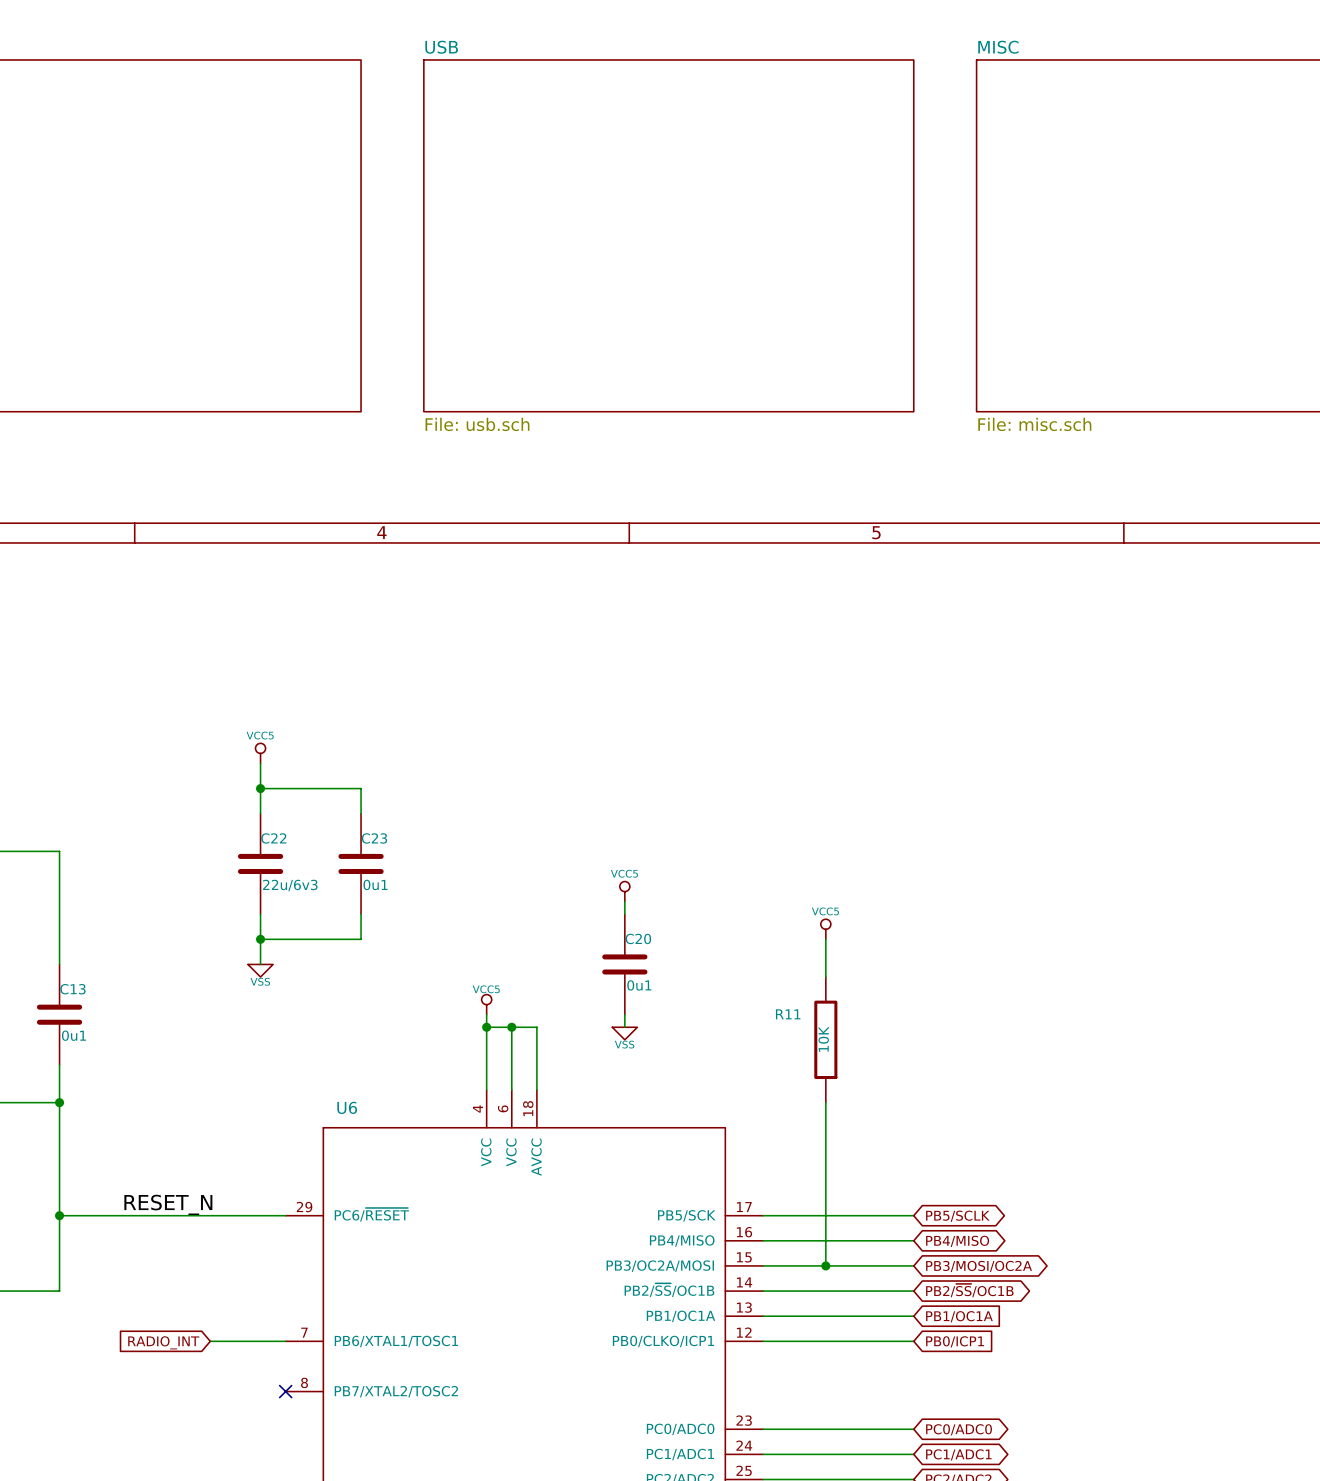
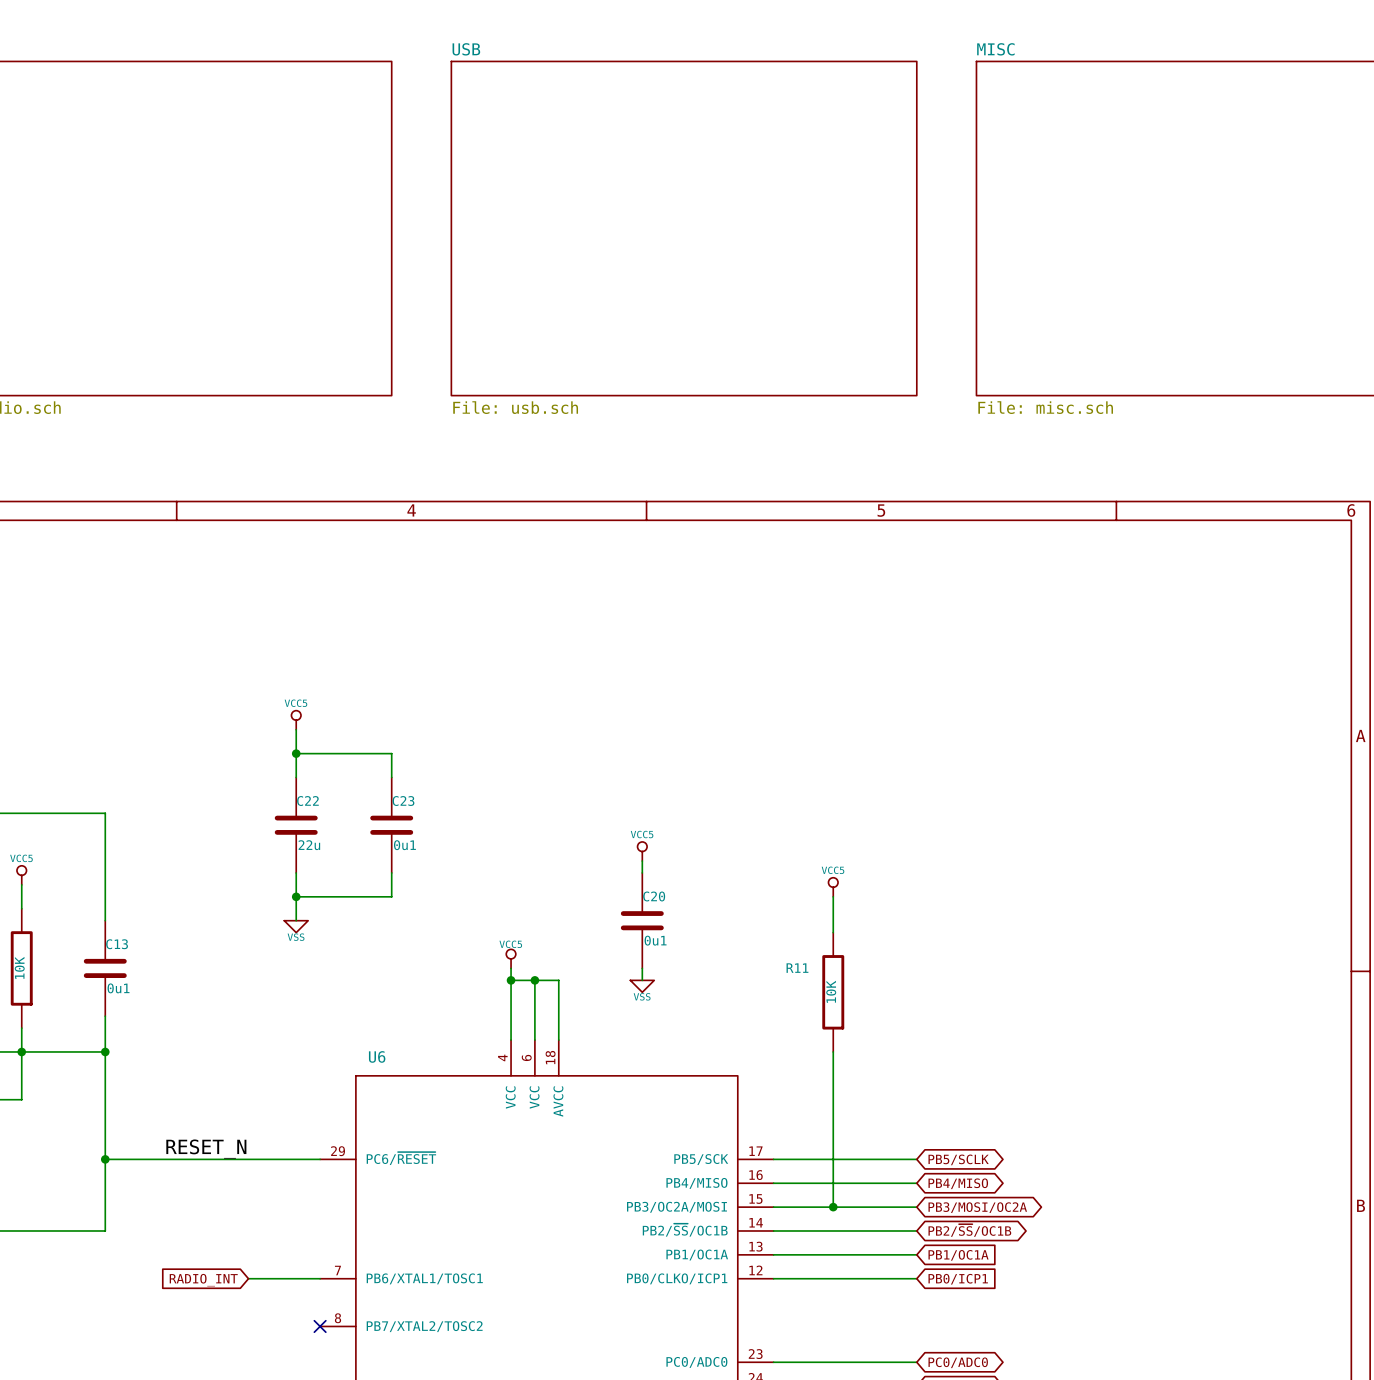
C22 value: 22u/6v3 (290, 885) -> 22u (309, 845)

